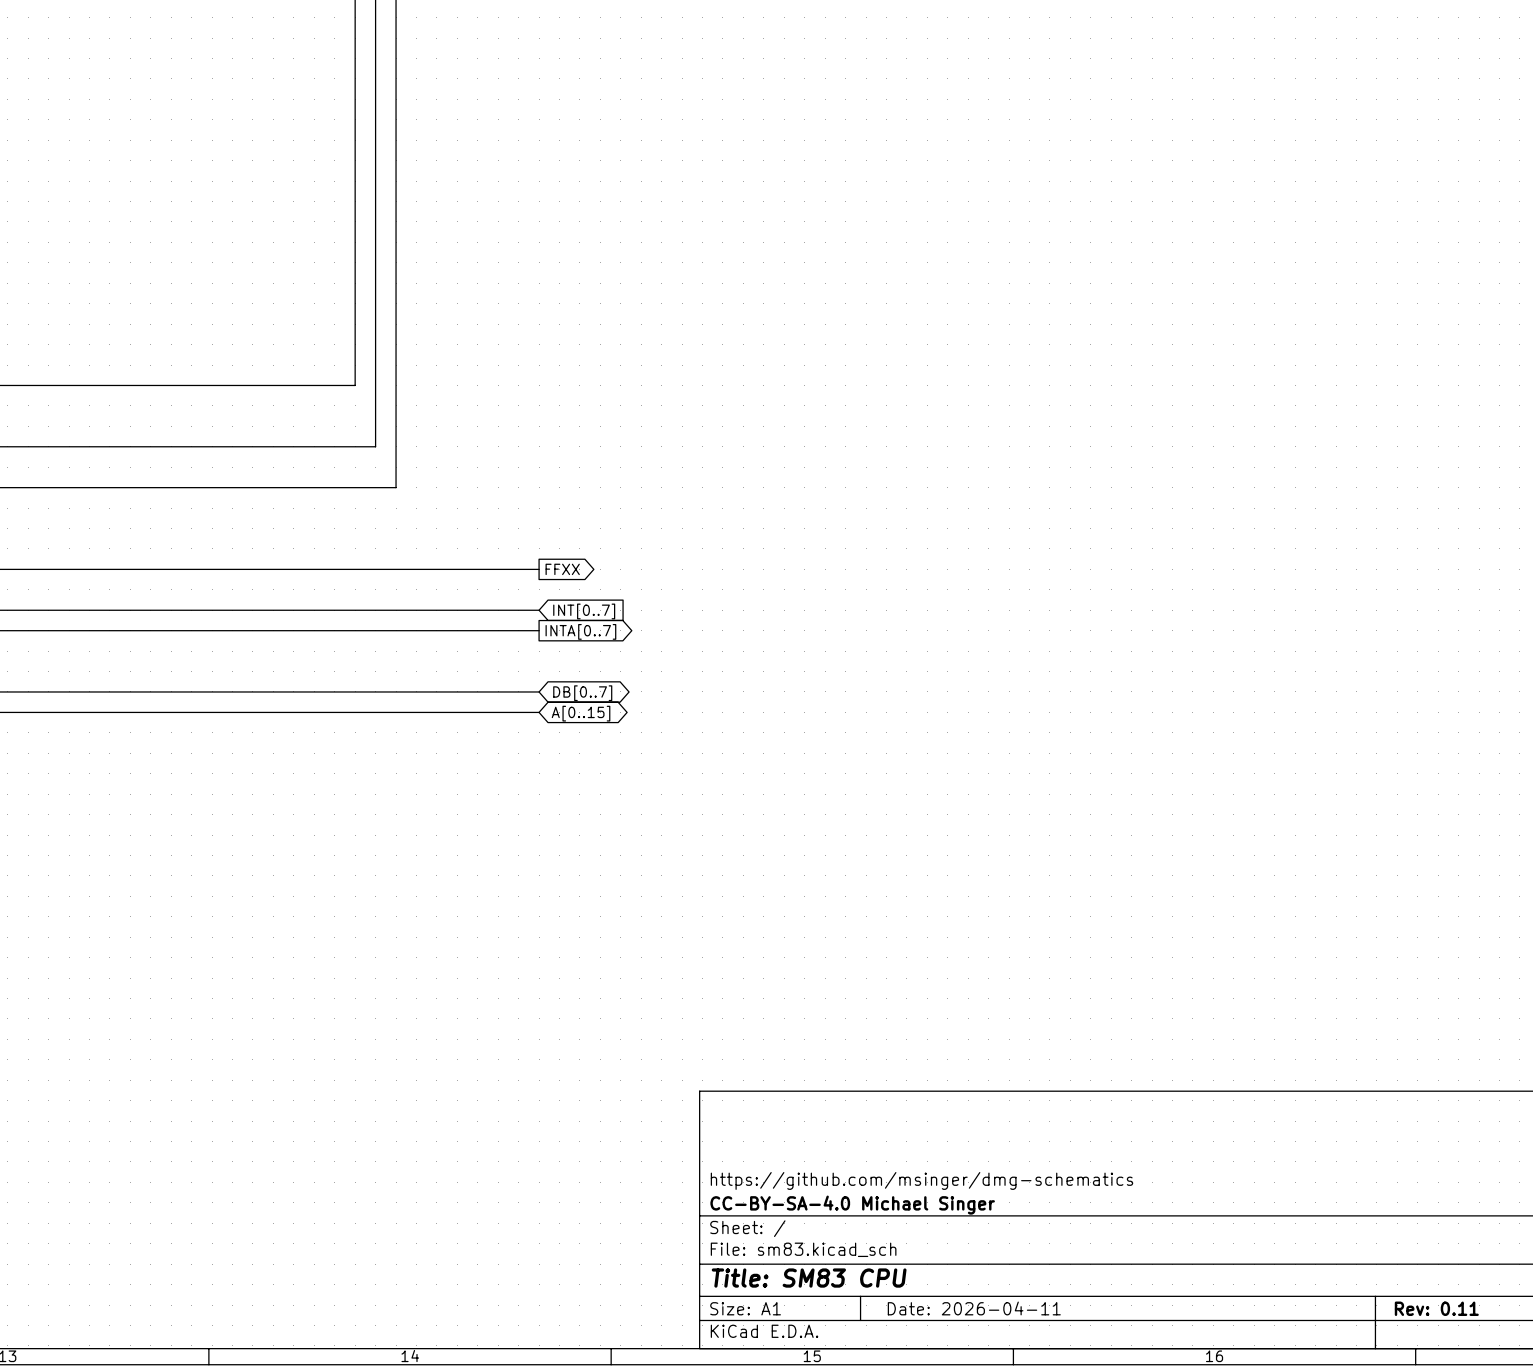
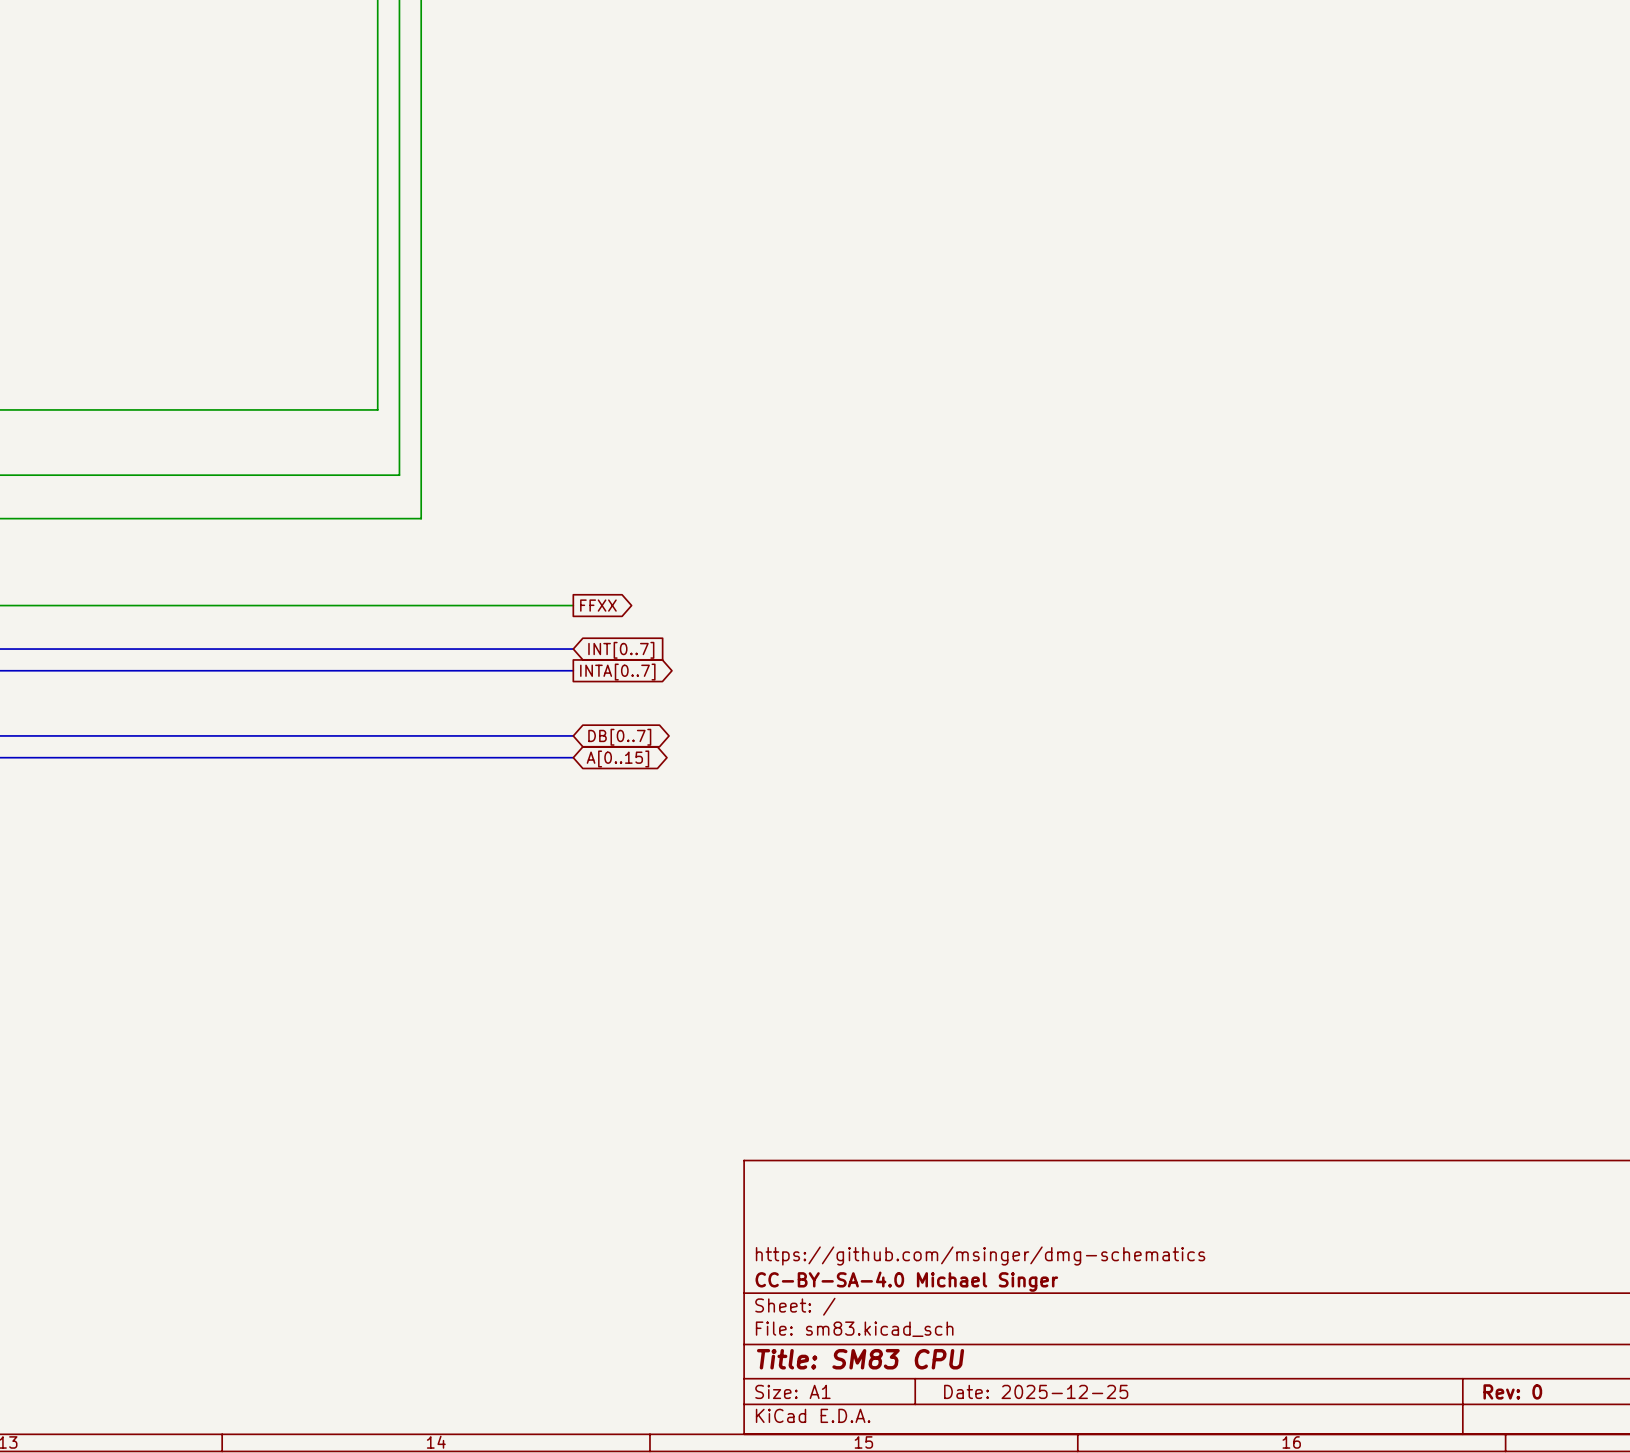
title block: Date: 2026-04-11 (974, 1308) -> Date: 2025-12-25 (1036, 1391)
title block: Rev: 0.11 (1436, 1308) -> Rev: 0 (1512, 1391)

